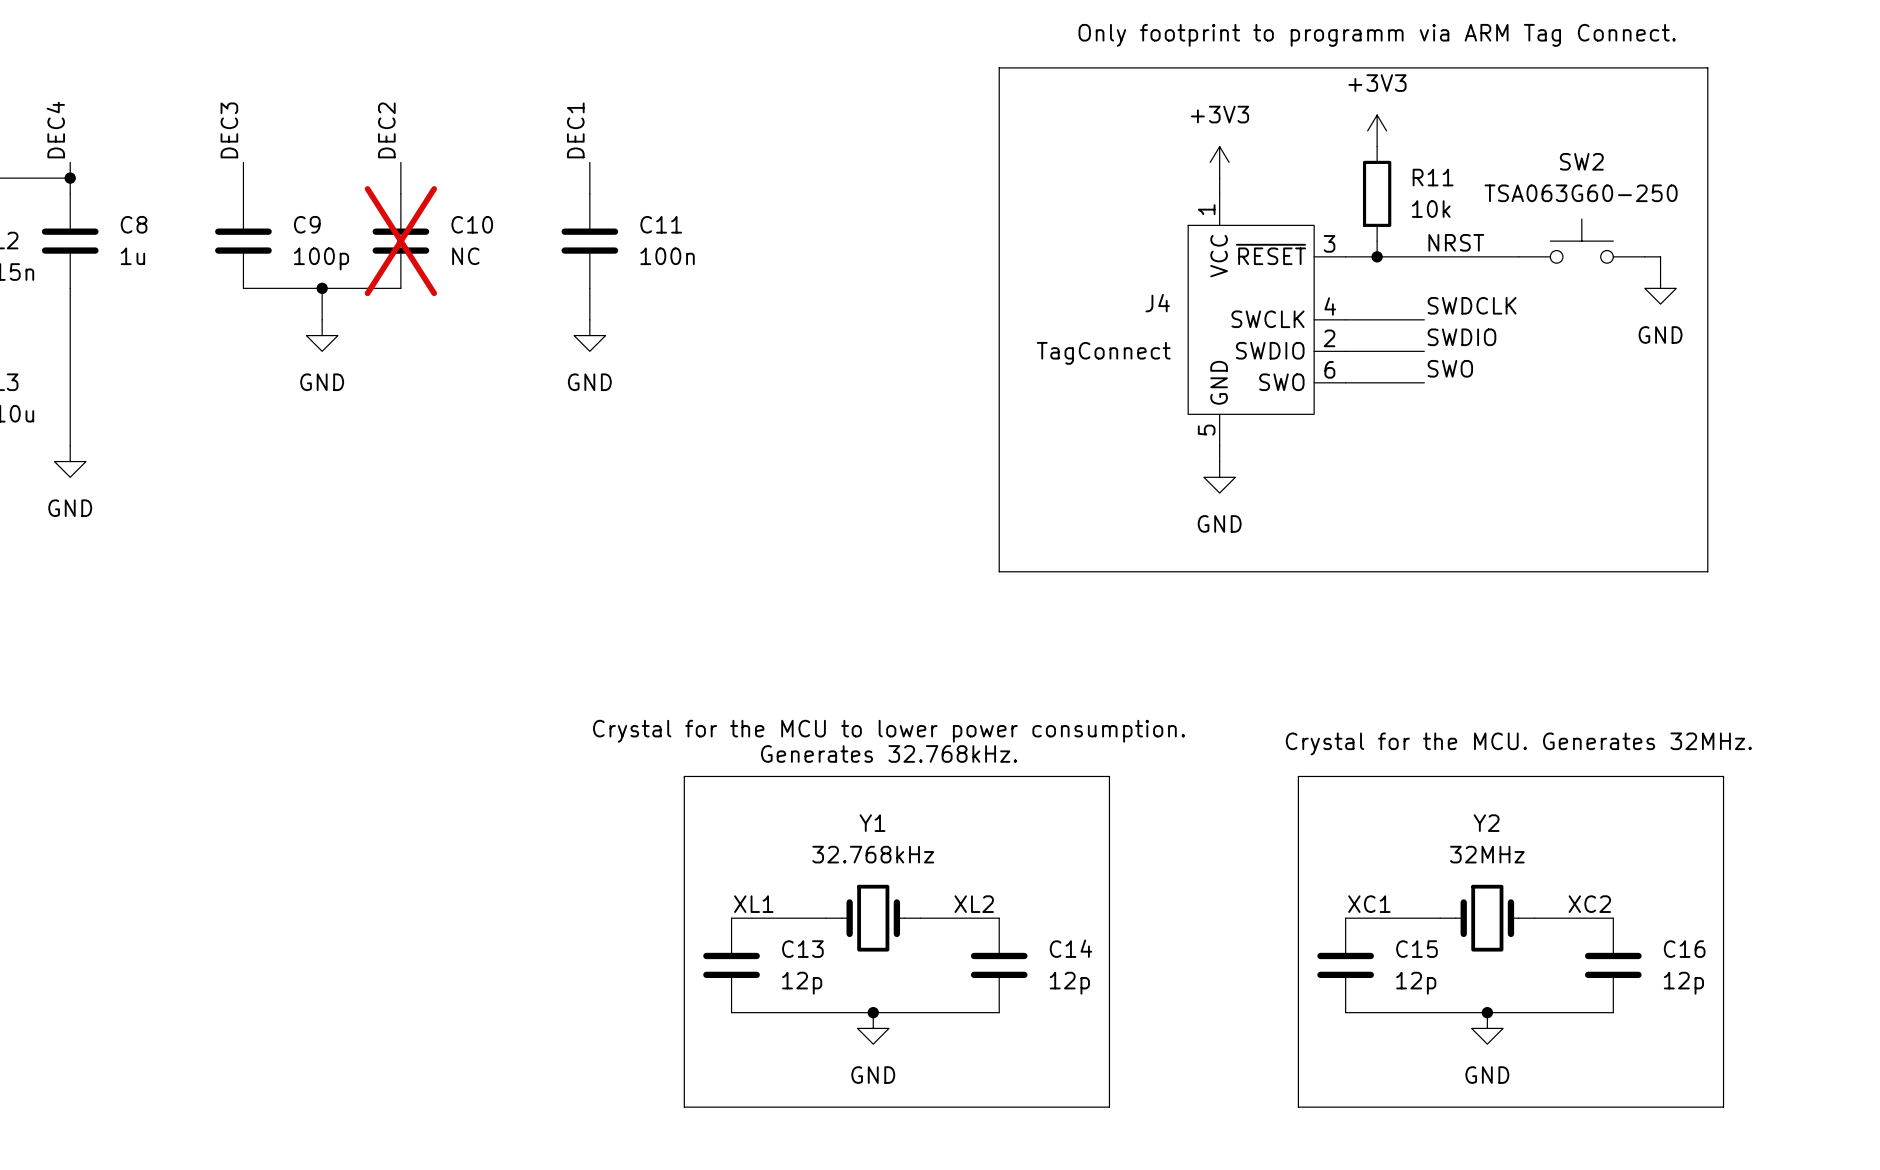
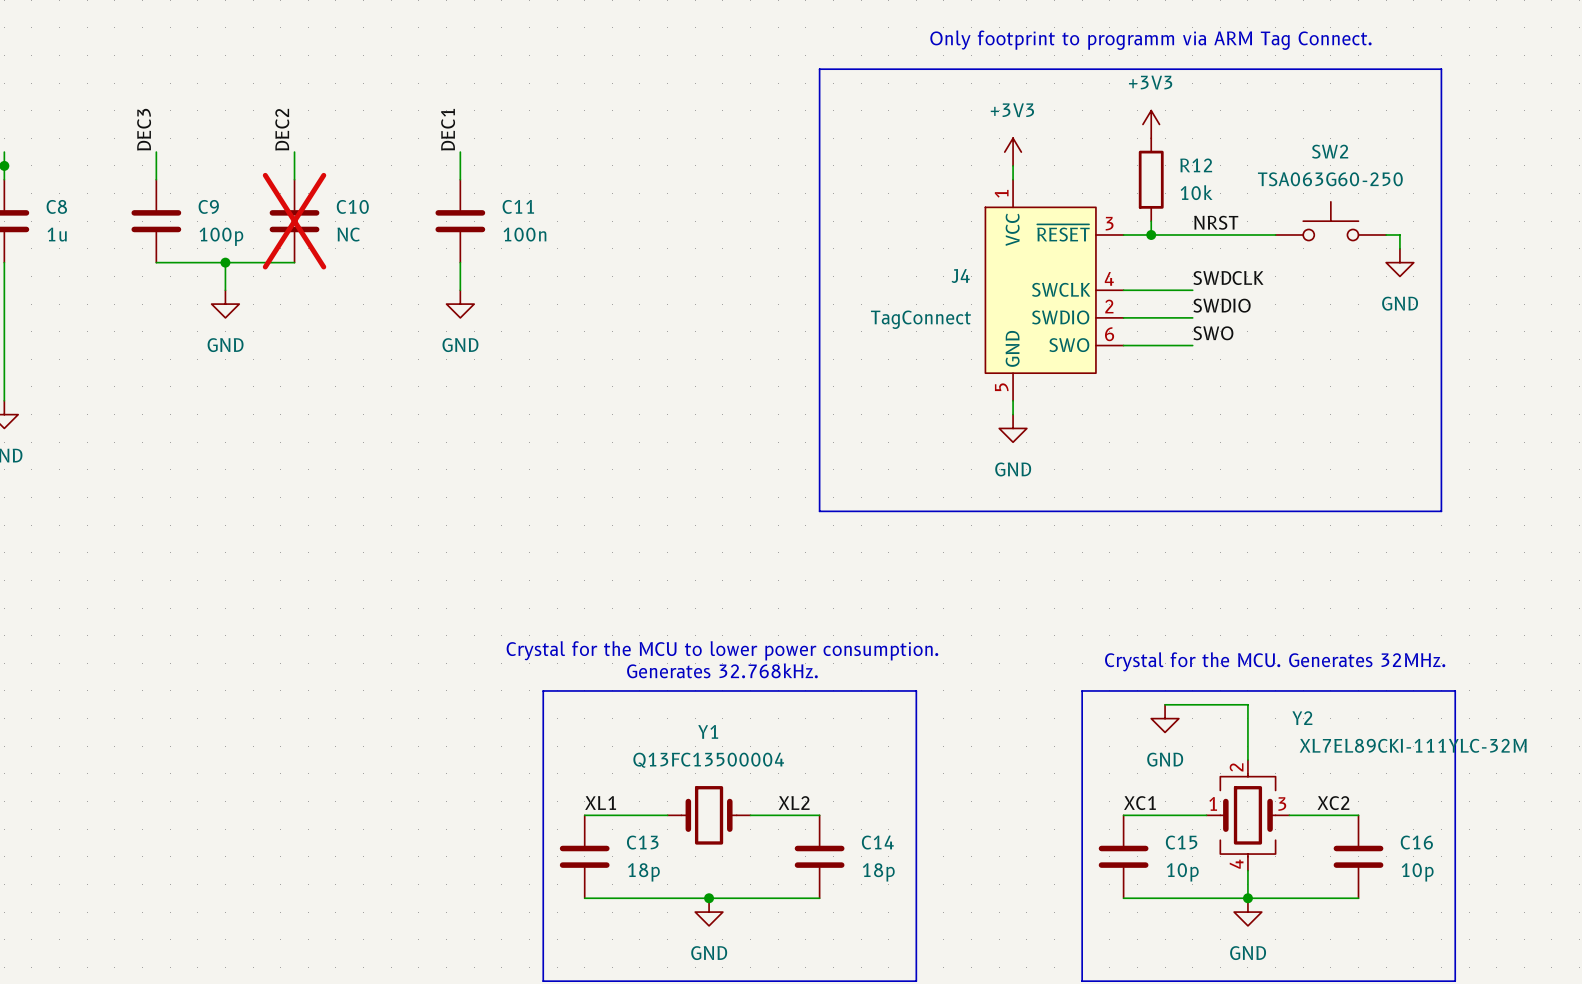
R11 name: R11 (1433, 177) -> R12 (1196, 165)
wire: none -> (1165, 704) (1247, 704) (1247, 760)
power symbol: none -> GND (1165, 718)
Y2 name position: Y2 (1486, 823) -> Y2 (1302, 718)
Y1 value: 32.768kHz (873, 854) -> Q13FC13500004 (708, 760)
Y2 value: 32MHz (1487, 854) -> XL7EL89CKI-111YLC-32M (1413, 745)
Y2 symbol: [1440, 884, 1535, 952] -> [1206, 760, 1290, 871]
wire: none -> (1247, 870) (1247, 898)
C13 value: 12p (802, 983) -> 18p (643, 872)
C14 value: 12p (1069, 983) -> 18p (878, 872)
C15 value: 12p (1416, 983) -> 10p (1182, 872)
C16 value: 12p (1683, 983) -> 10p (1417, 872)

